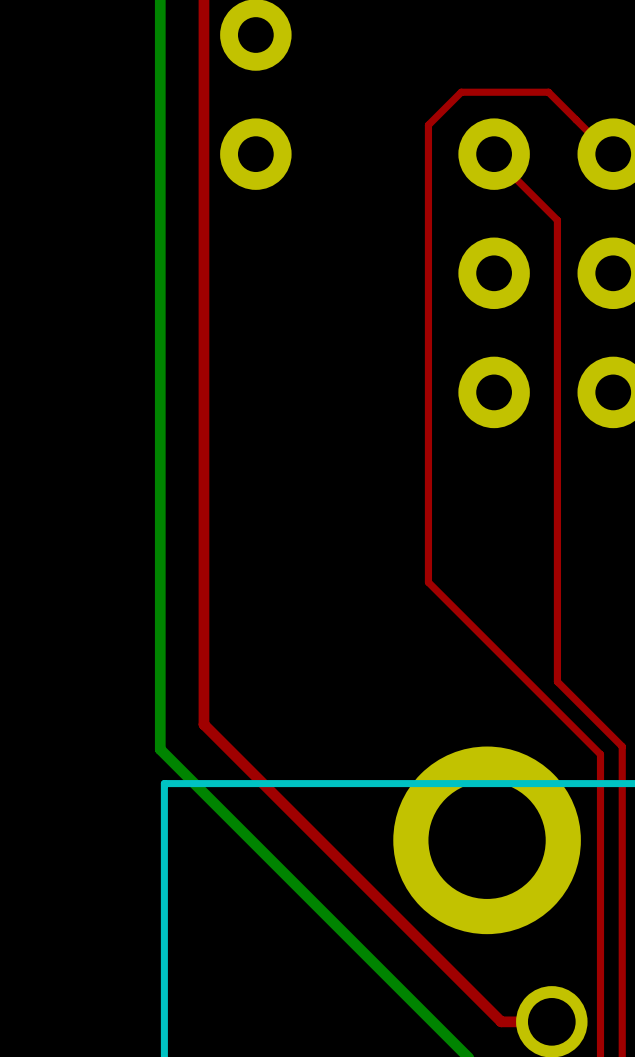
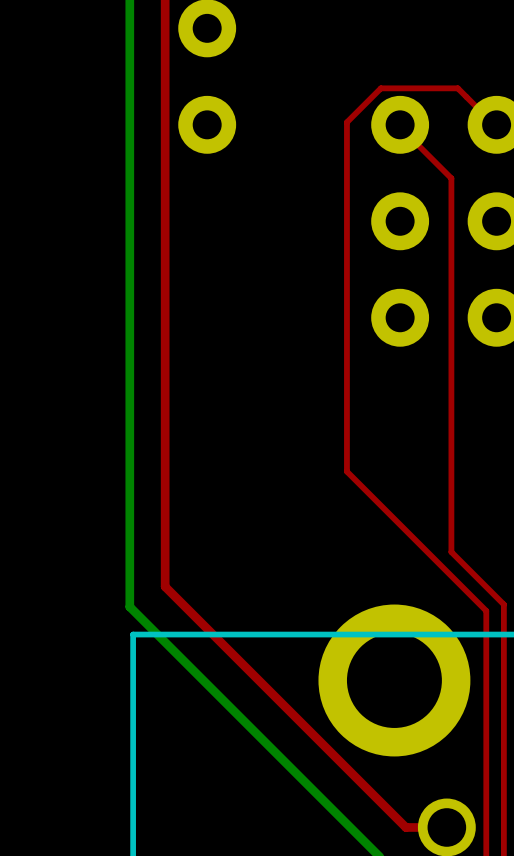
top track: (565, 109) (548, 92) (461, 92) (428, 125) (428, 151) -> (457, 88) (380, 88) (346, 122)

